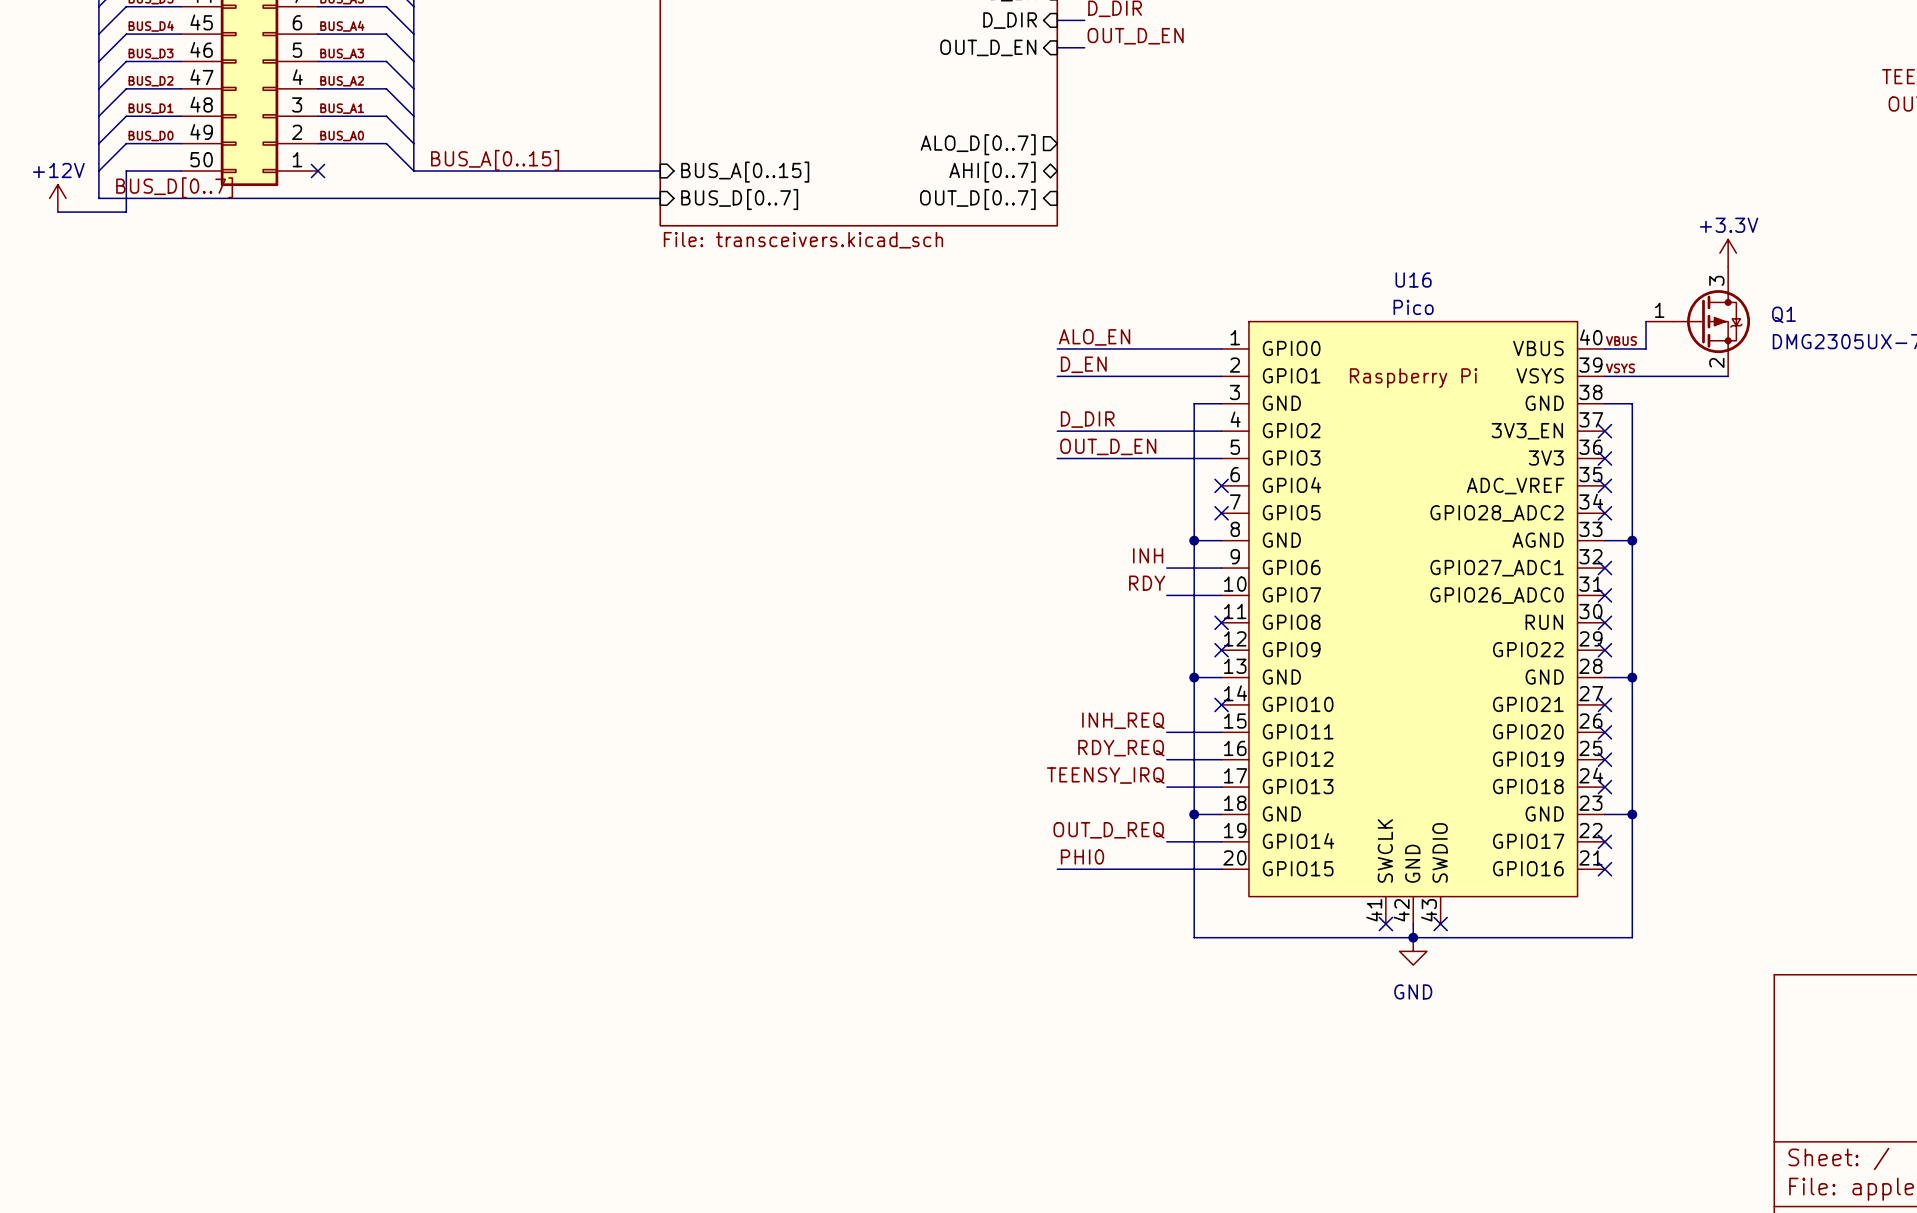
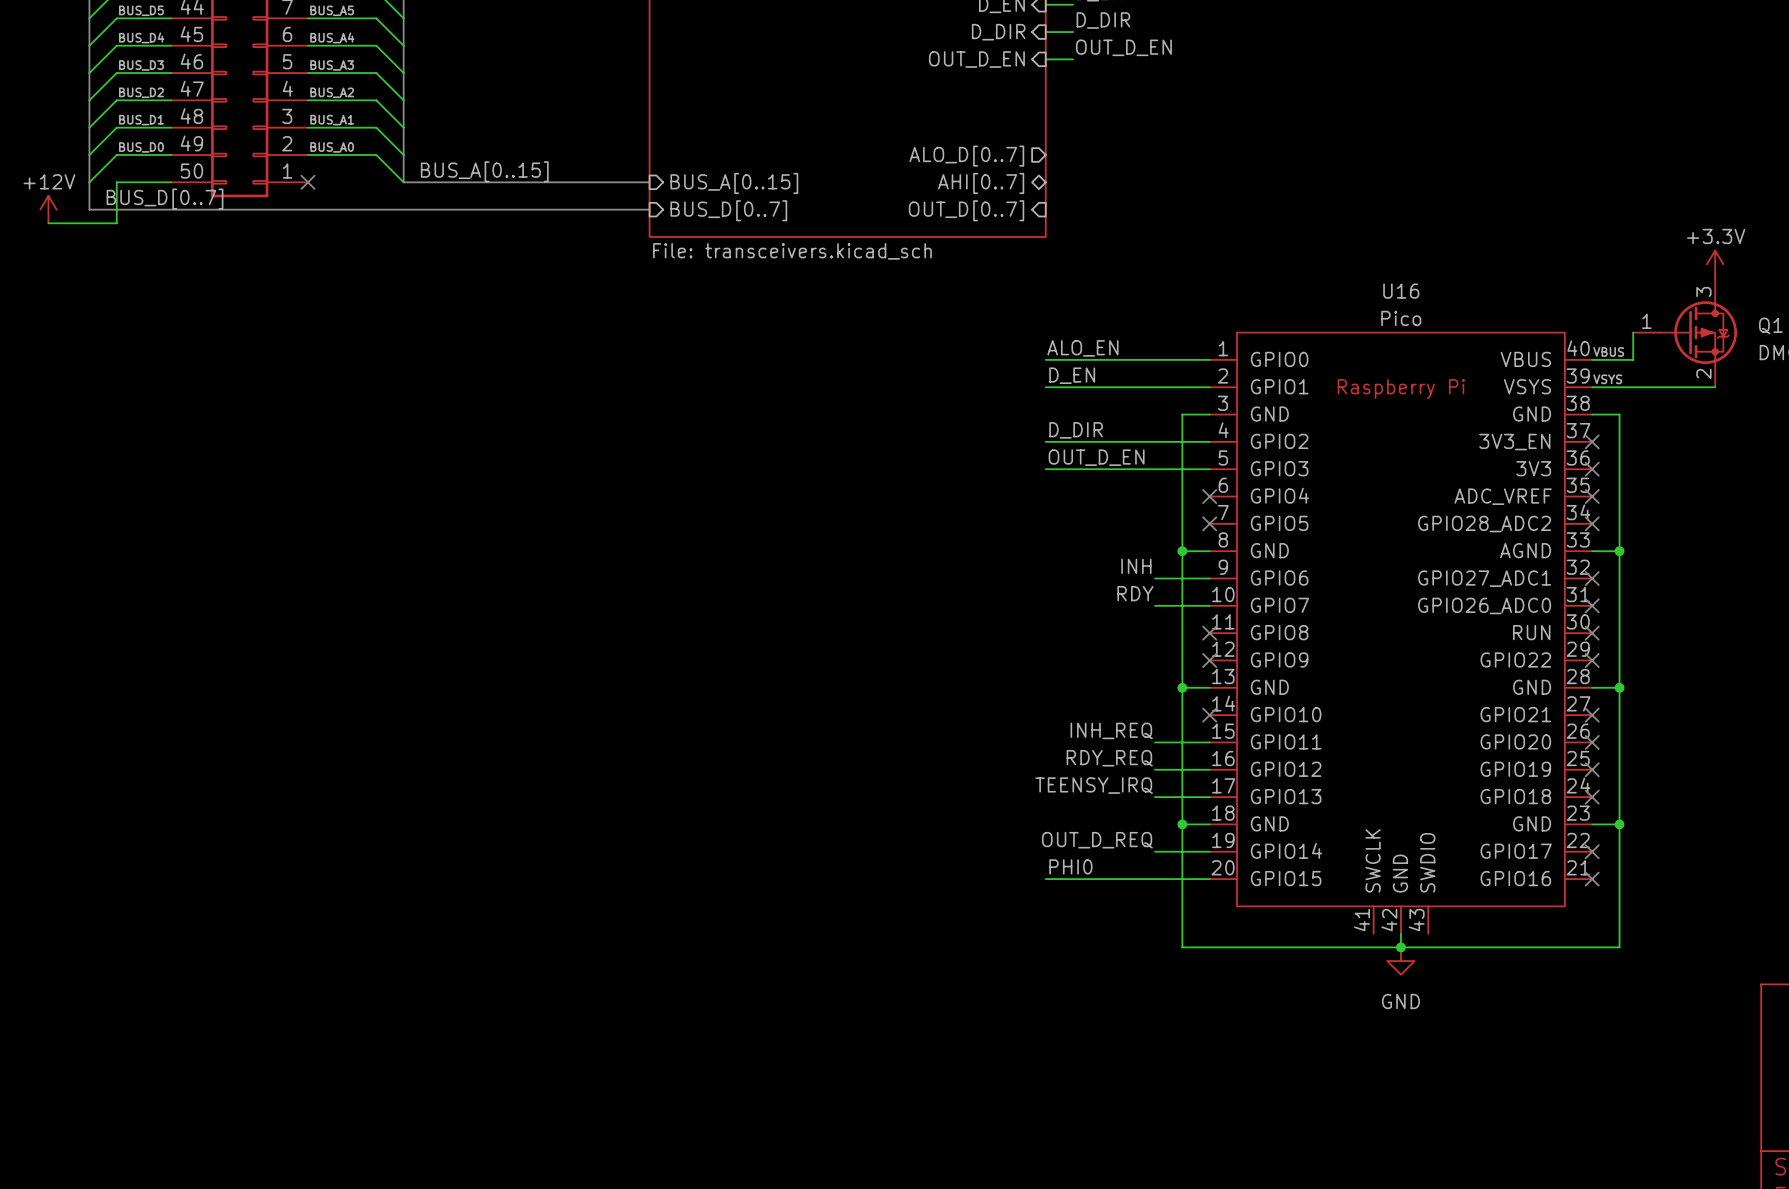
no-connect mark: (1385, 924) -> none
no-connect mark: (1440, 924) -> none

